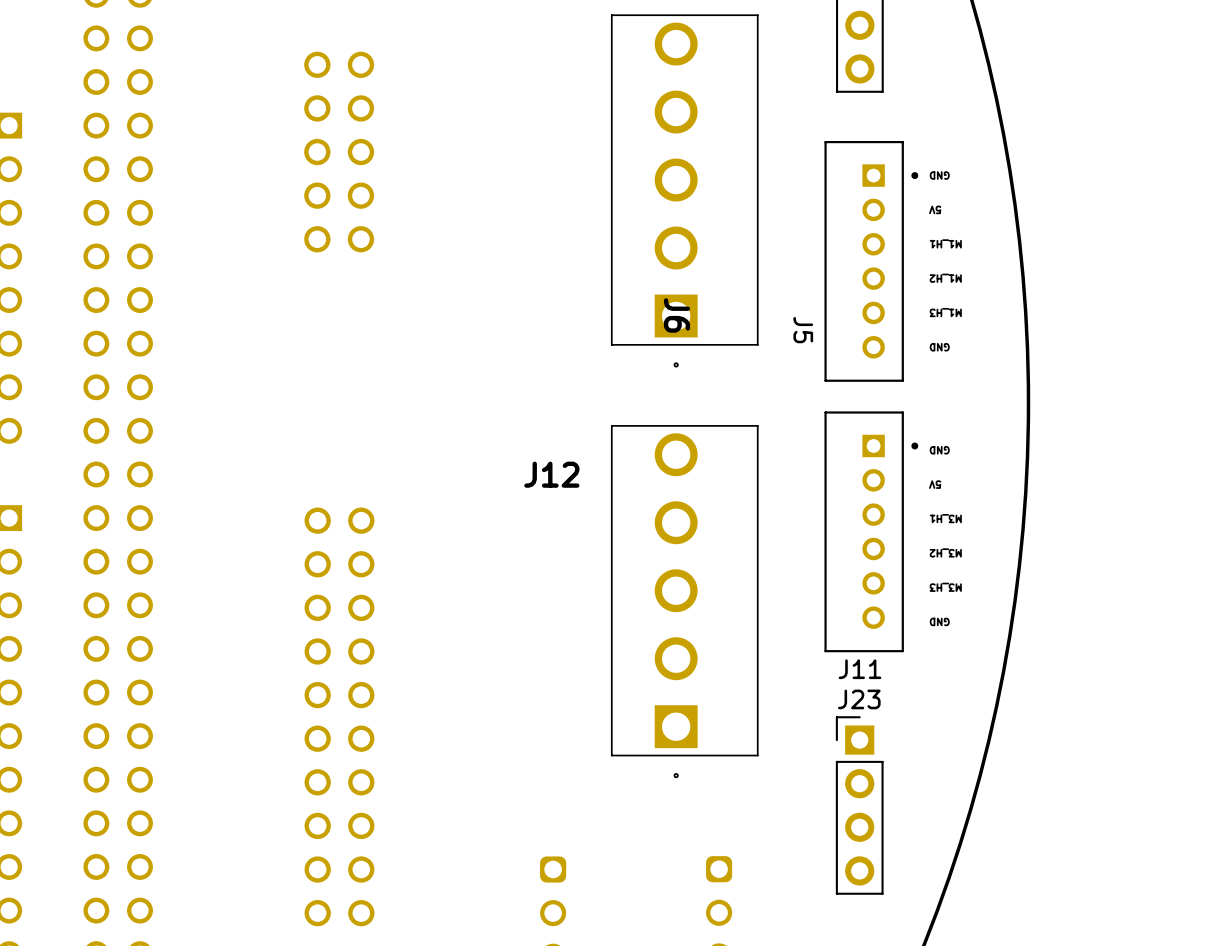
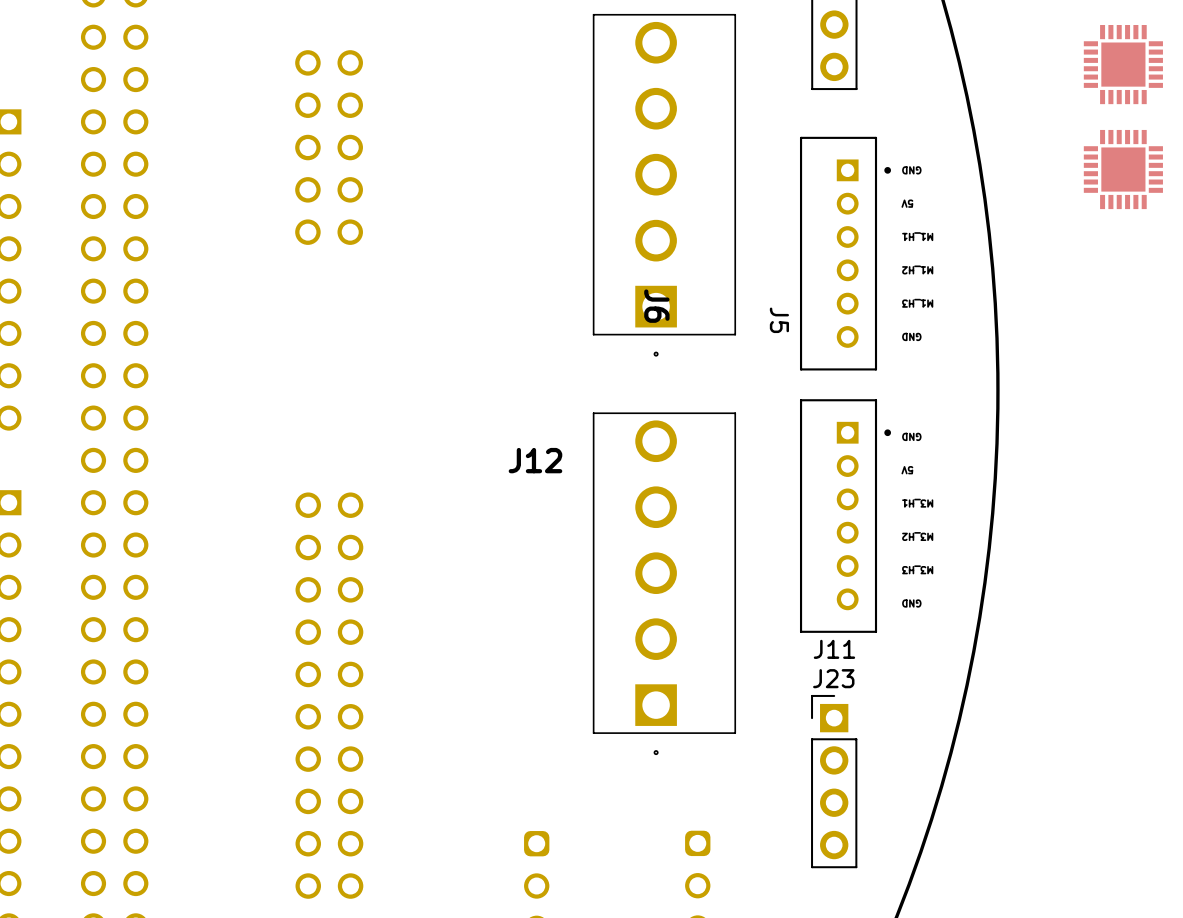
part: none -> (1123, 64)
part: none -> (1123, 169)

